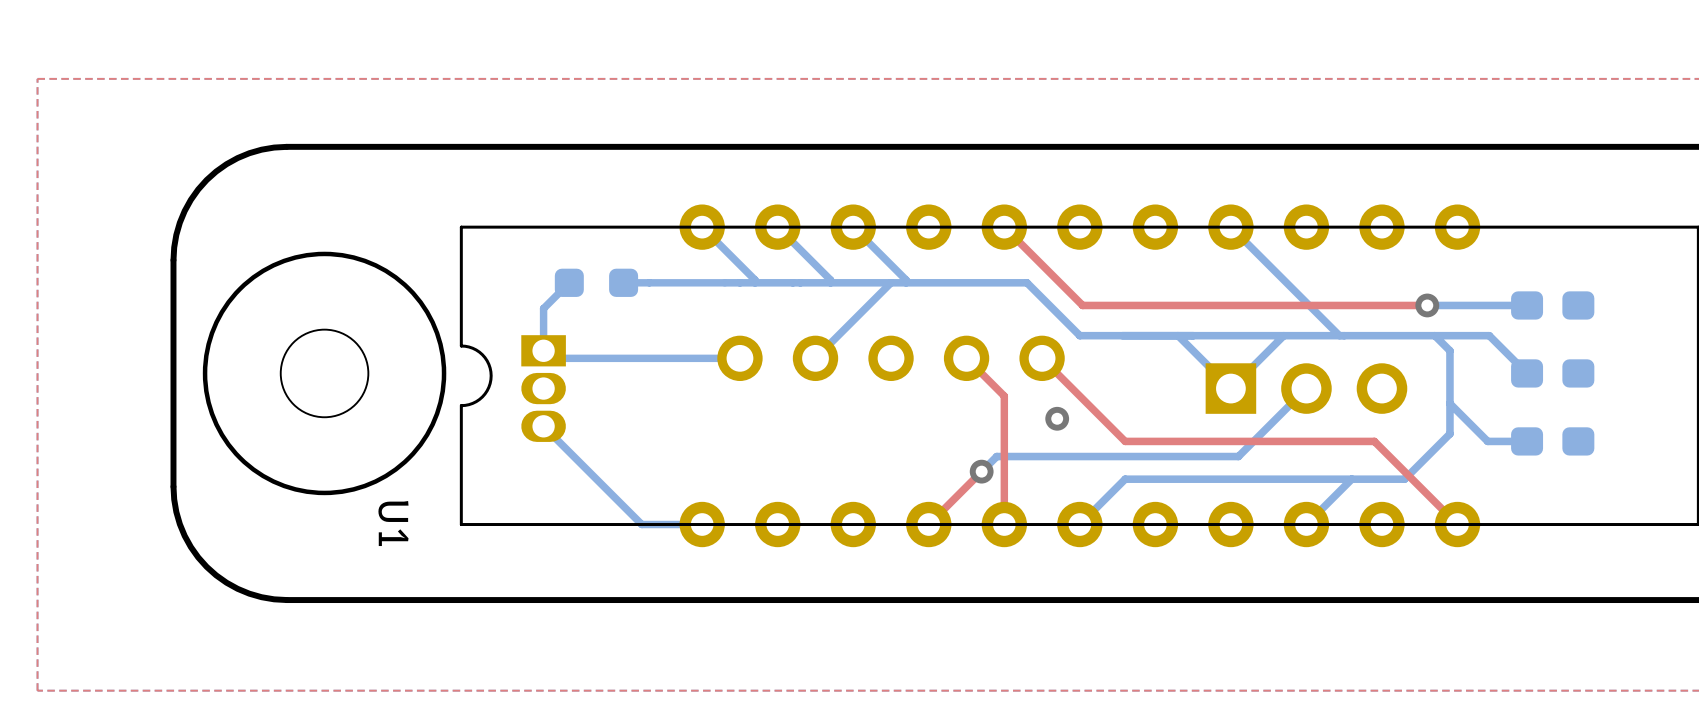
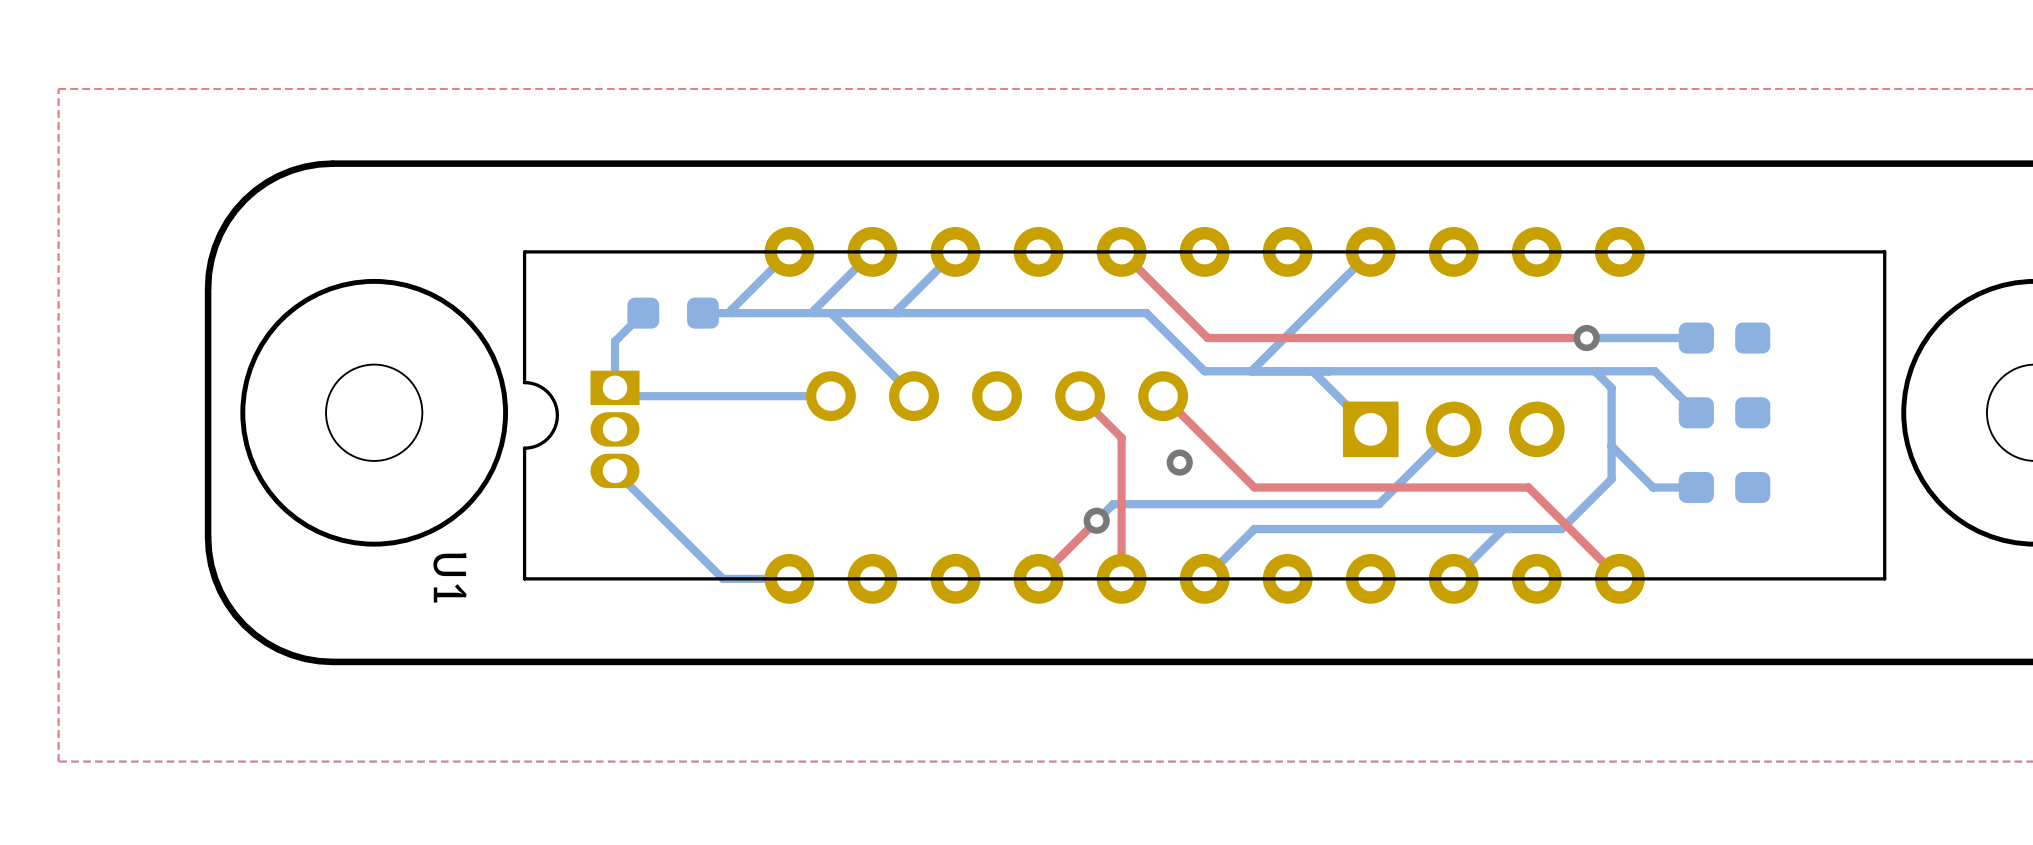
bottom track: (702, 227) (755, 280) (755, 282) -> (789, 251) (731, 310) (731, 313)
bottom track: (777, 227) (830, 280) (830, 282) -> (872, 251) (814, 310) (814, 313)
bottom track: (853, 227) (906, 280) (906, 282) -> (955, 251) (897, 310) (897, 313)
bottom track: (1230, 227) (1339, 335) (1344, 335) -> (1370, 251) (1251, 371)
bottom track: (891, 282) (815, 358) -> (830, 313) (913, 396)
bottom track: (1283, 335) (1230, 388) -> none

